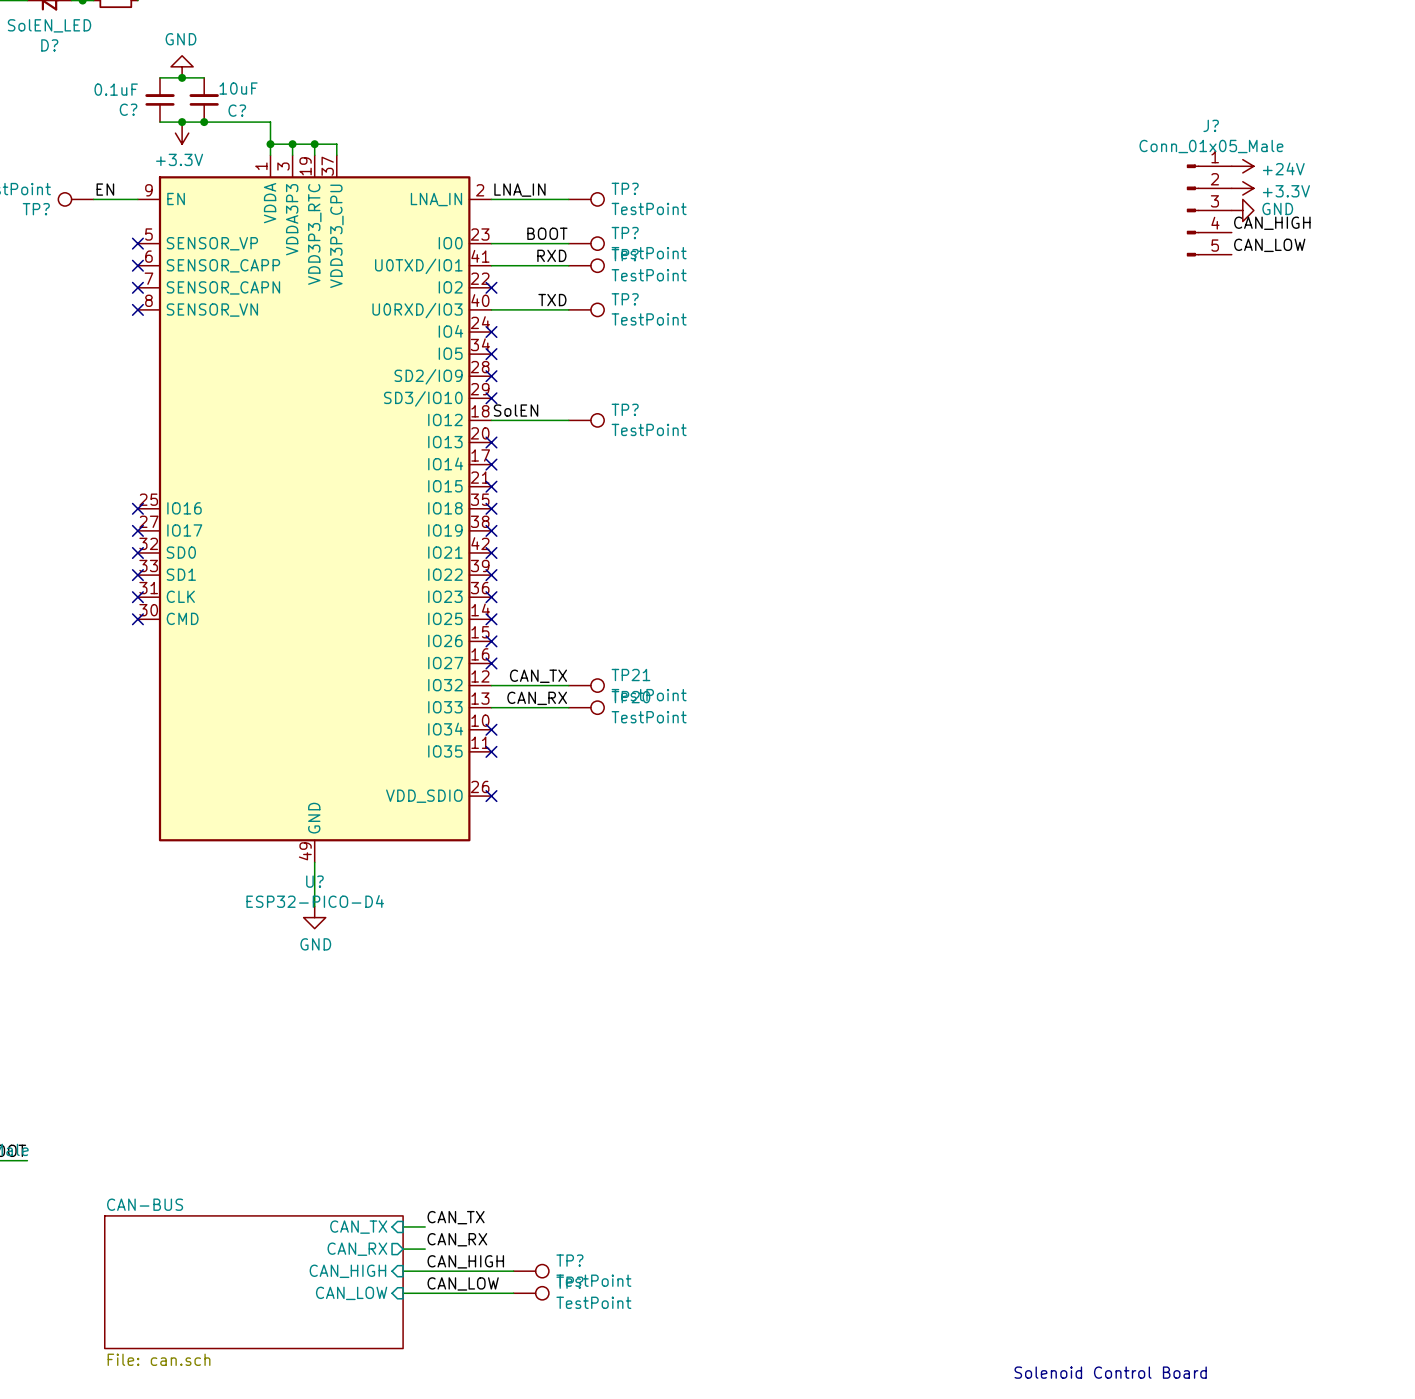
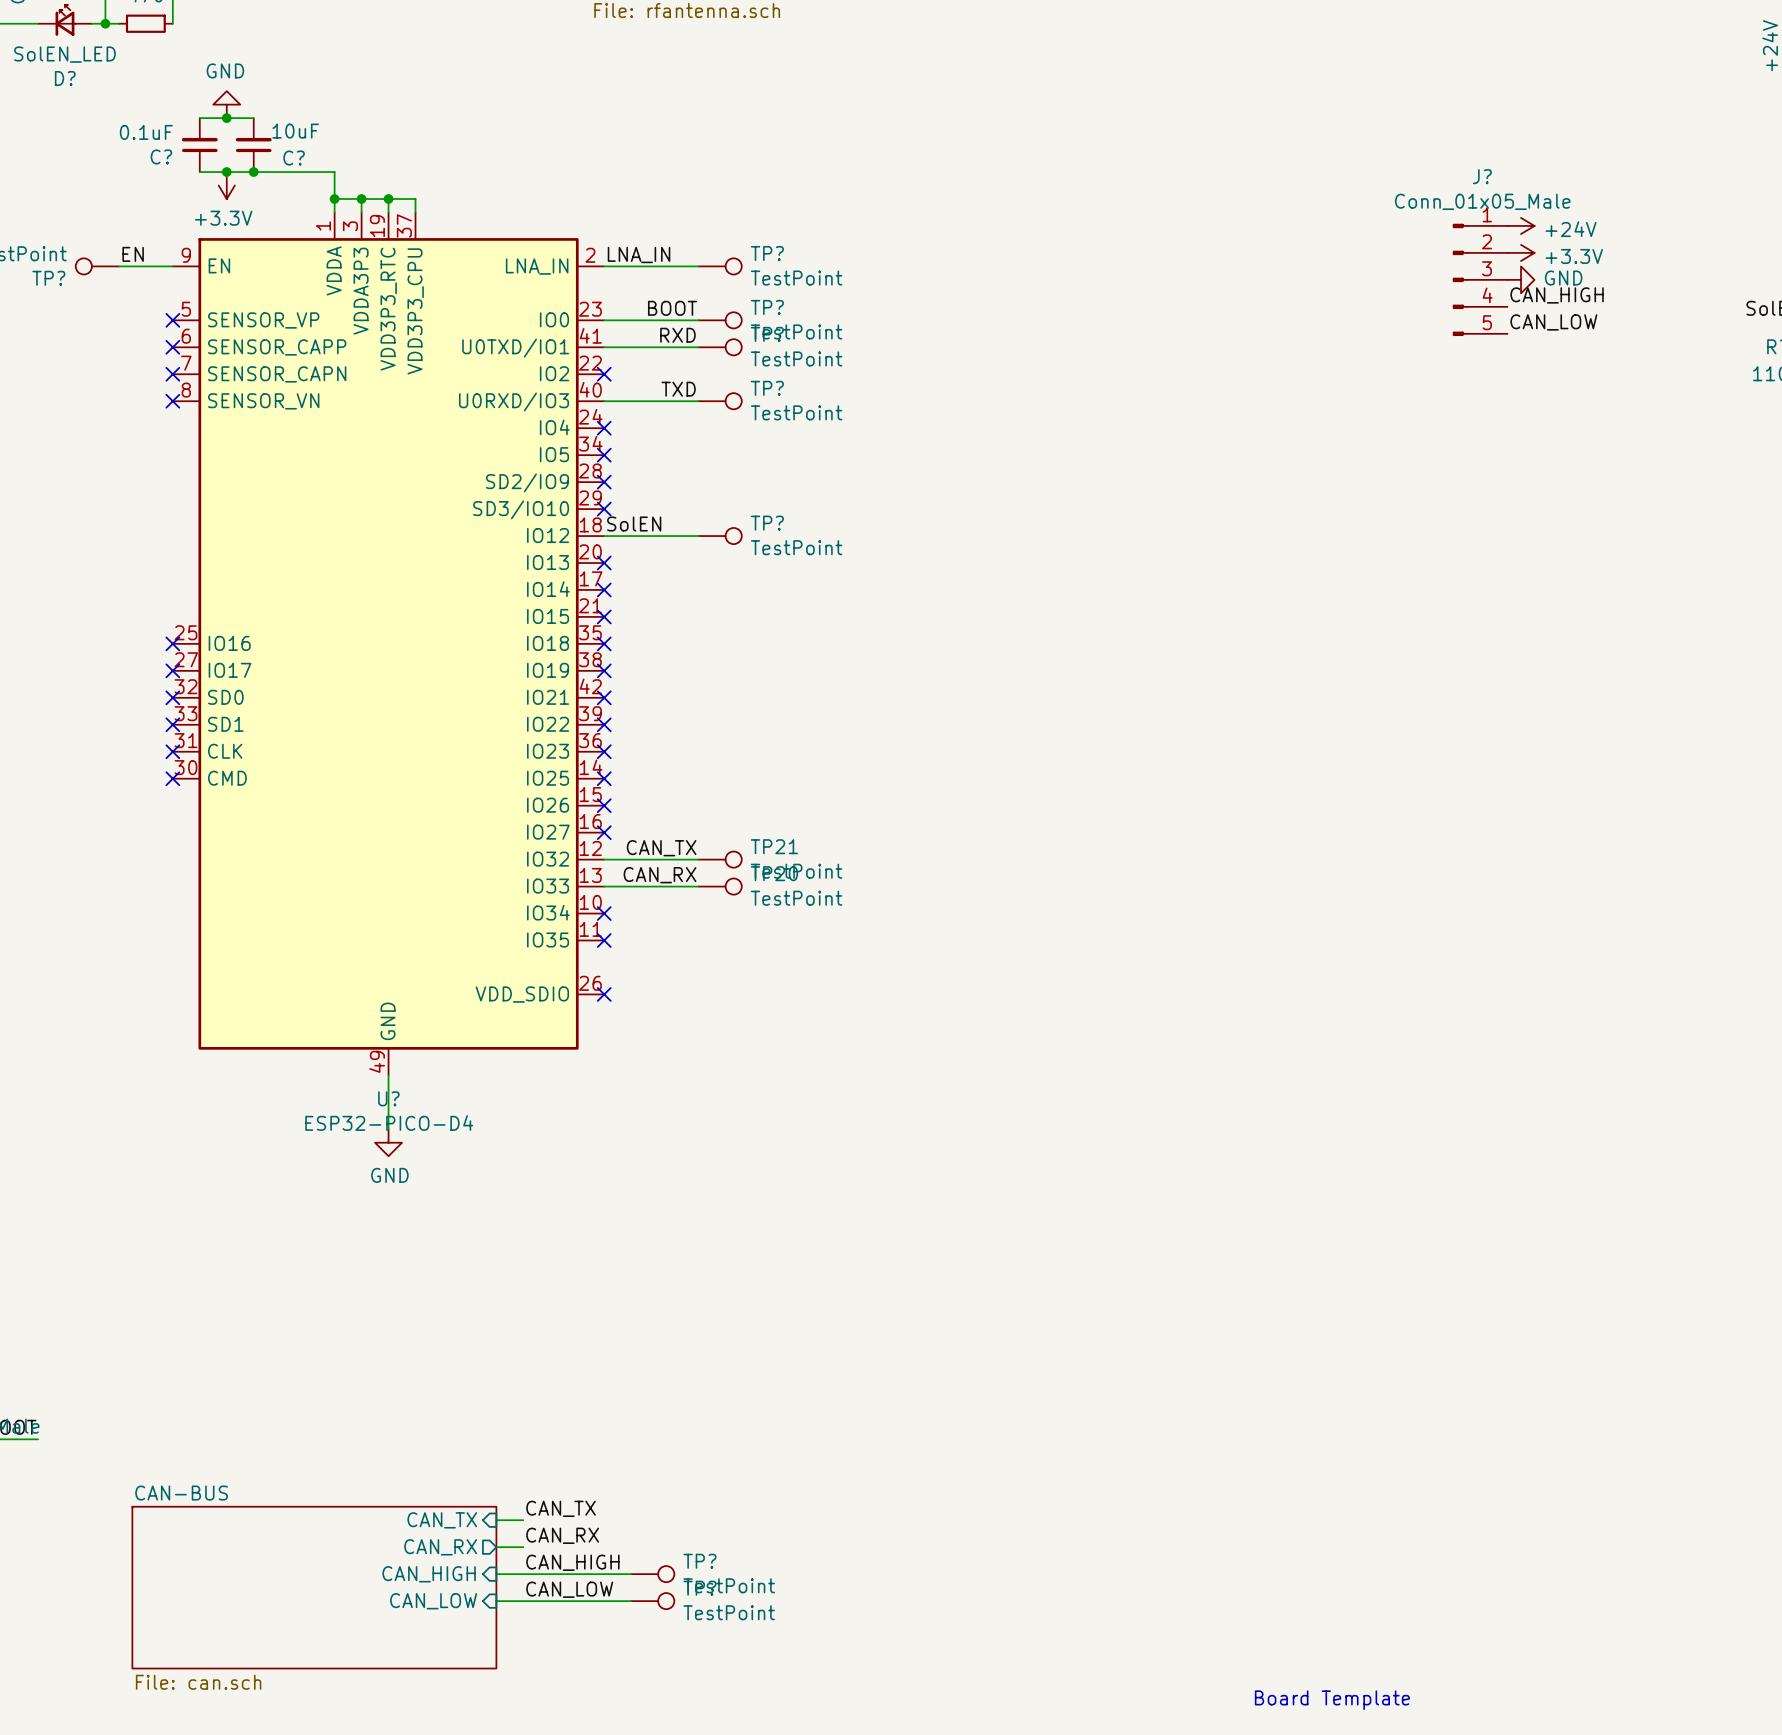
text: Solenoid Control Board (1110, 1372) -> none
text: none -> Board Template (1332, 1700)

